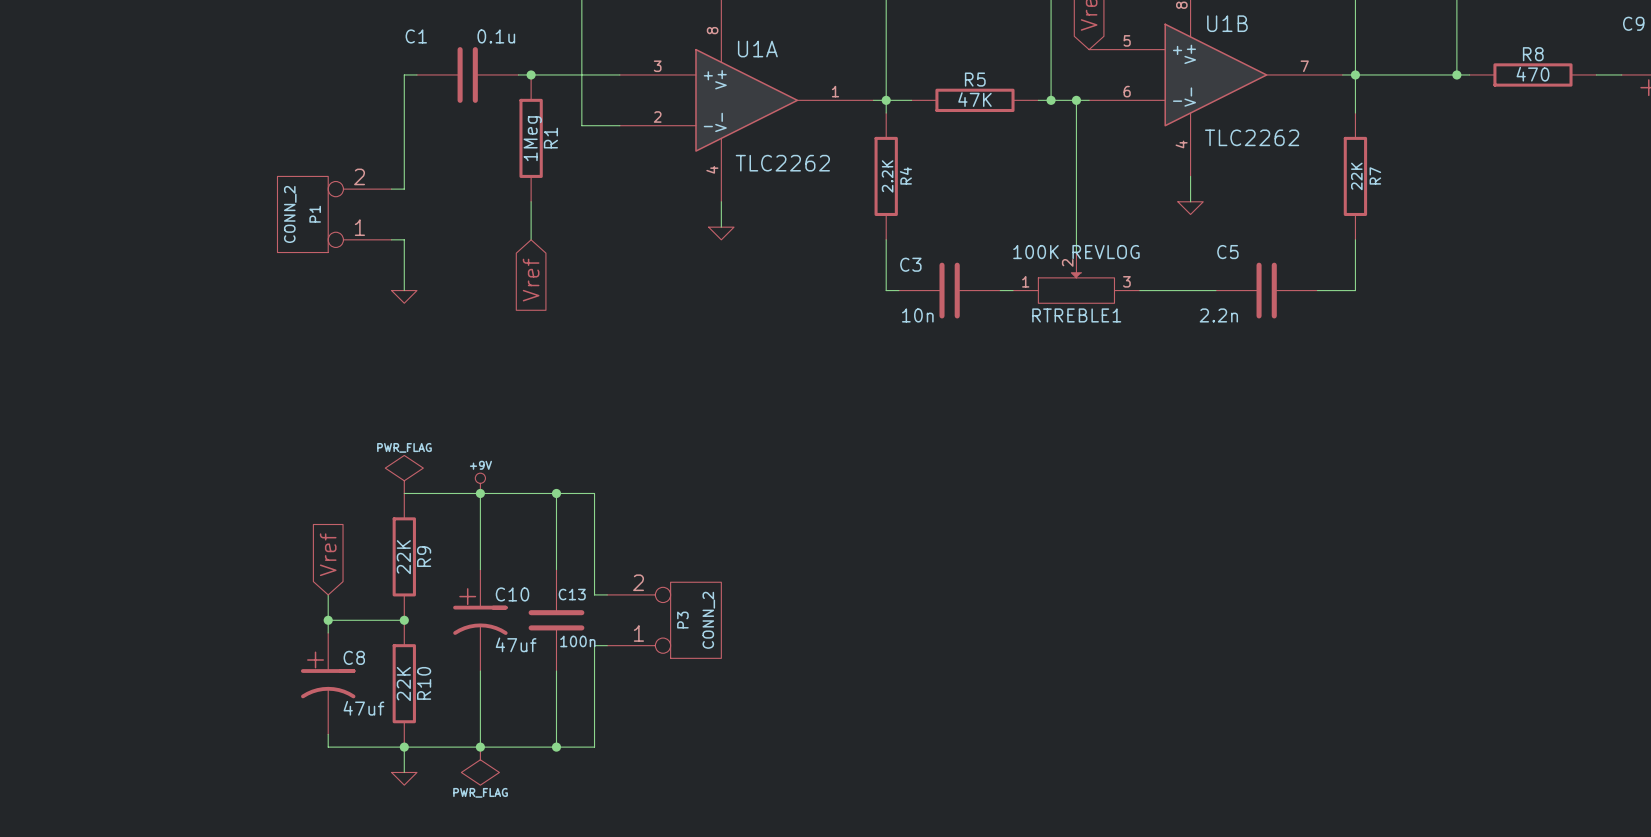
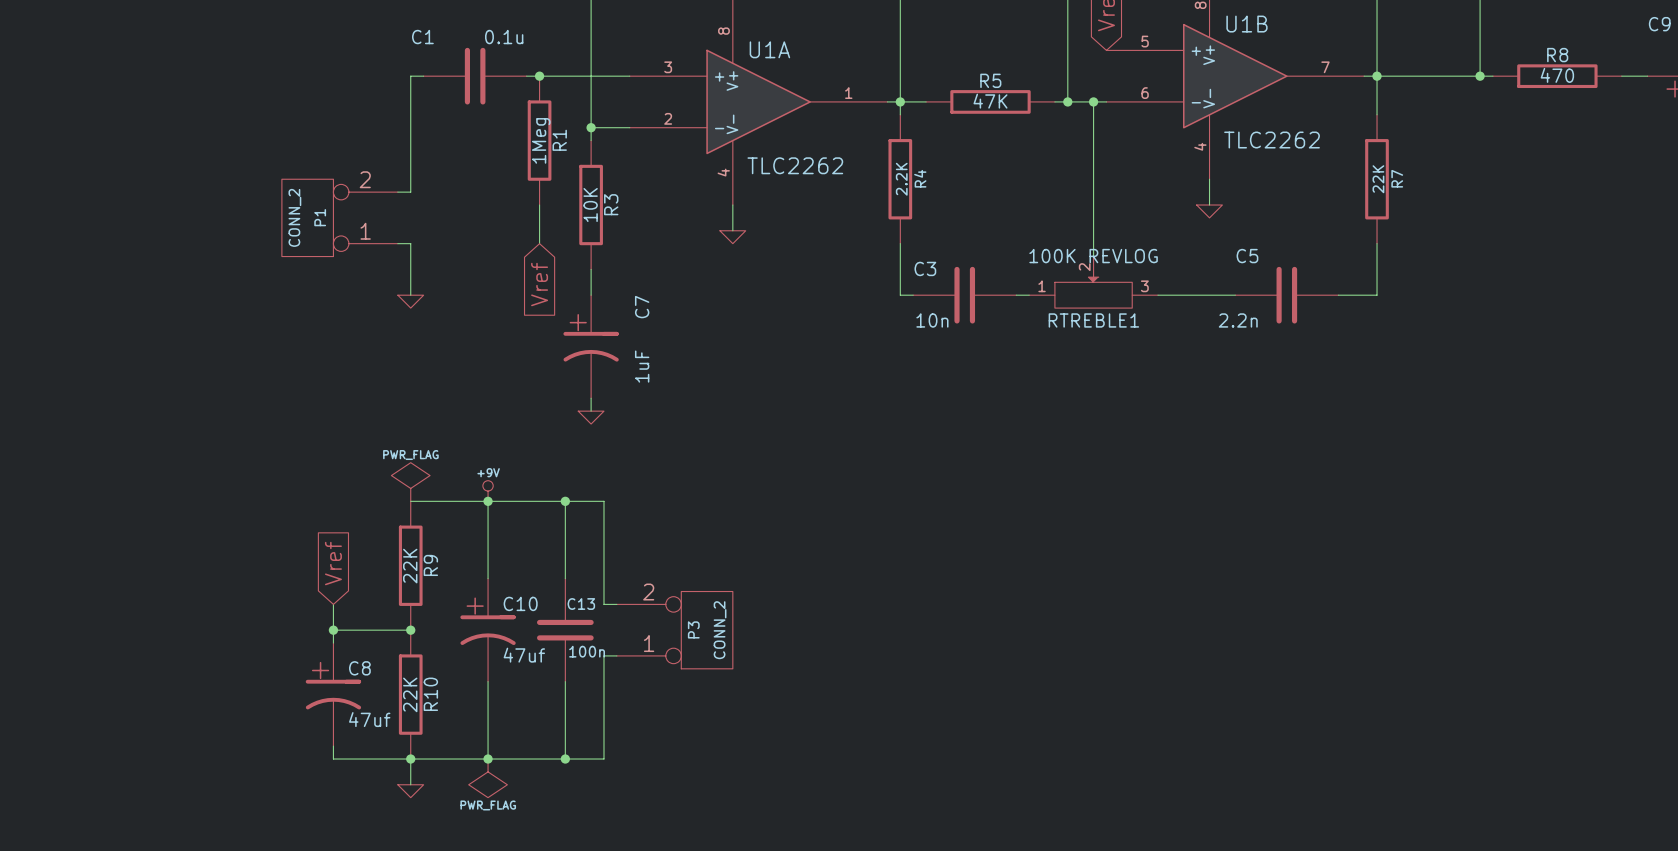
wire: none -> (591, 127) (591, 140)
junction: none -> (591, 127)
R3: none -> 10K (591, 205)
wire: none -> (591, 269) (591, 295)
C7: none -> 1uF (591, 346)
wire: none -> (591, 398) (591, 411)
power symbol: none -> (591, 417)

